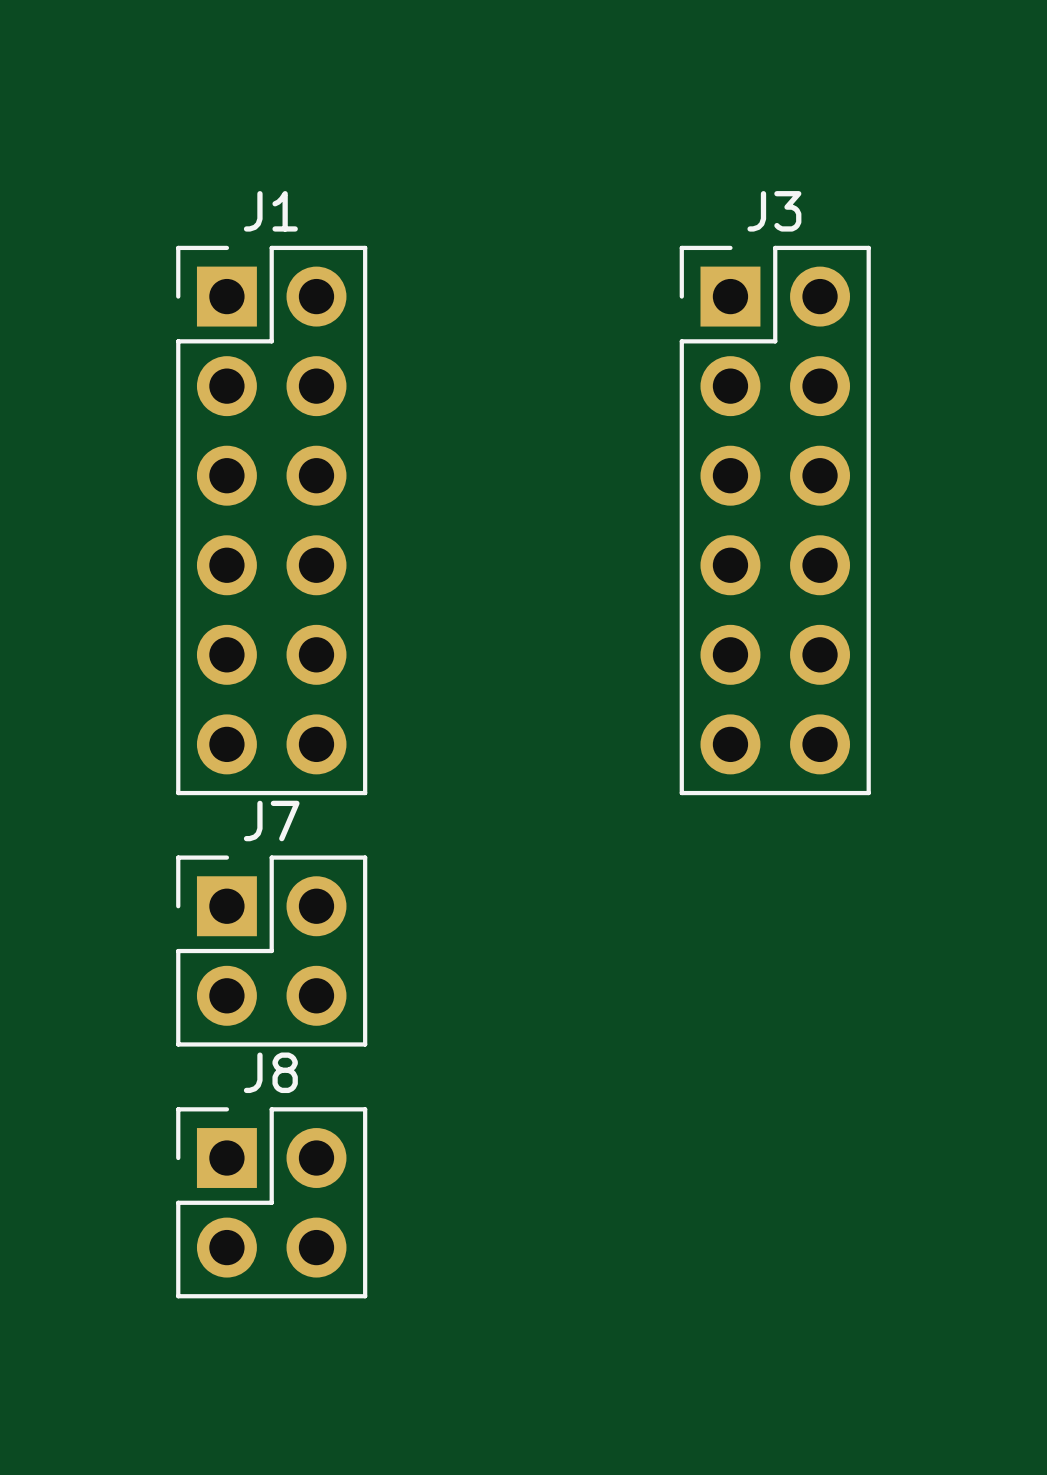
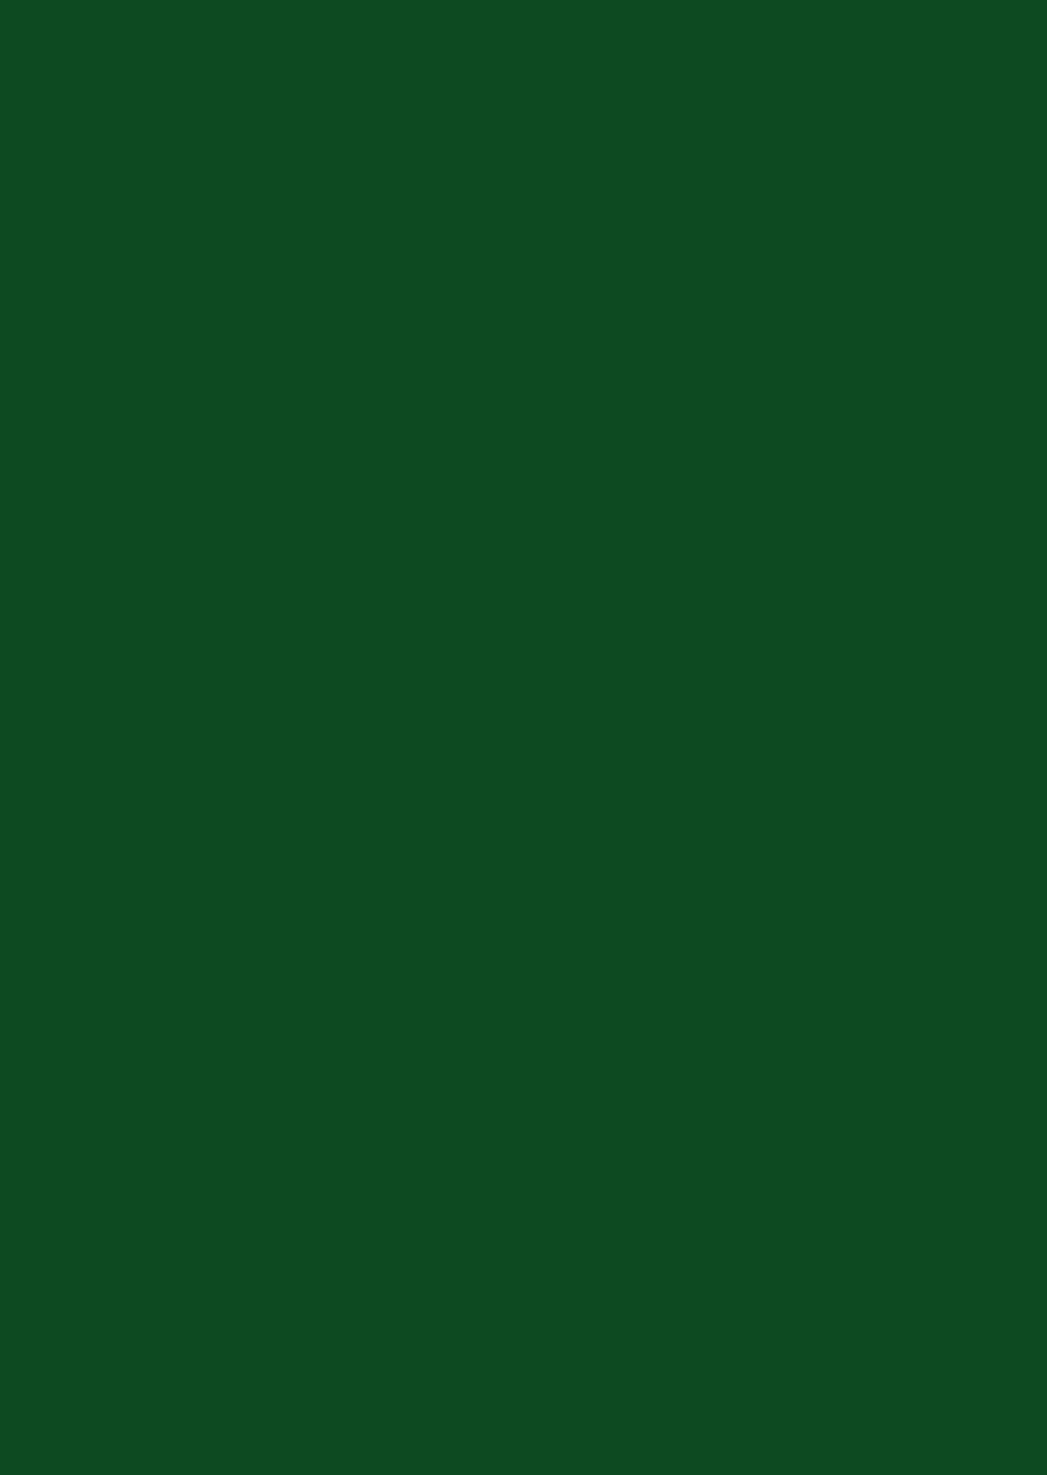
J1: (271, 520) -> none
J3: (775, 520) -> none
J7: (271, 951) -> none
J8: (271, 1202) -> none

